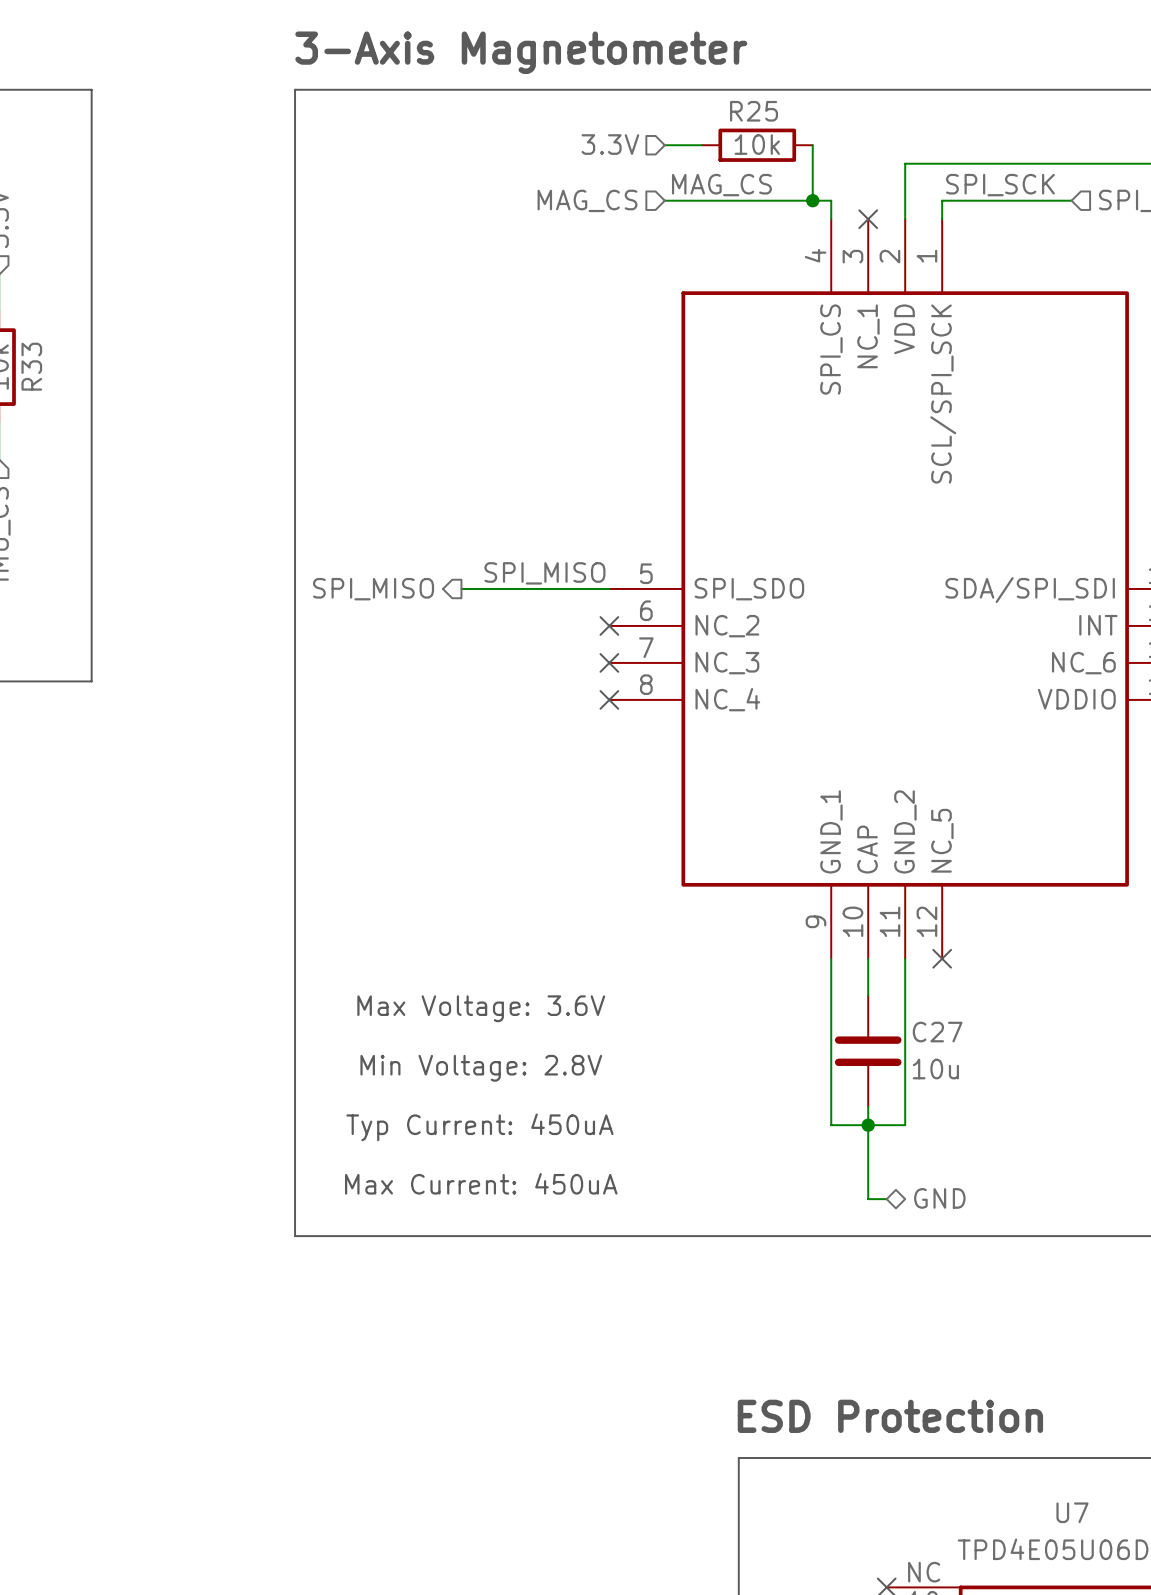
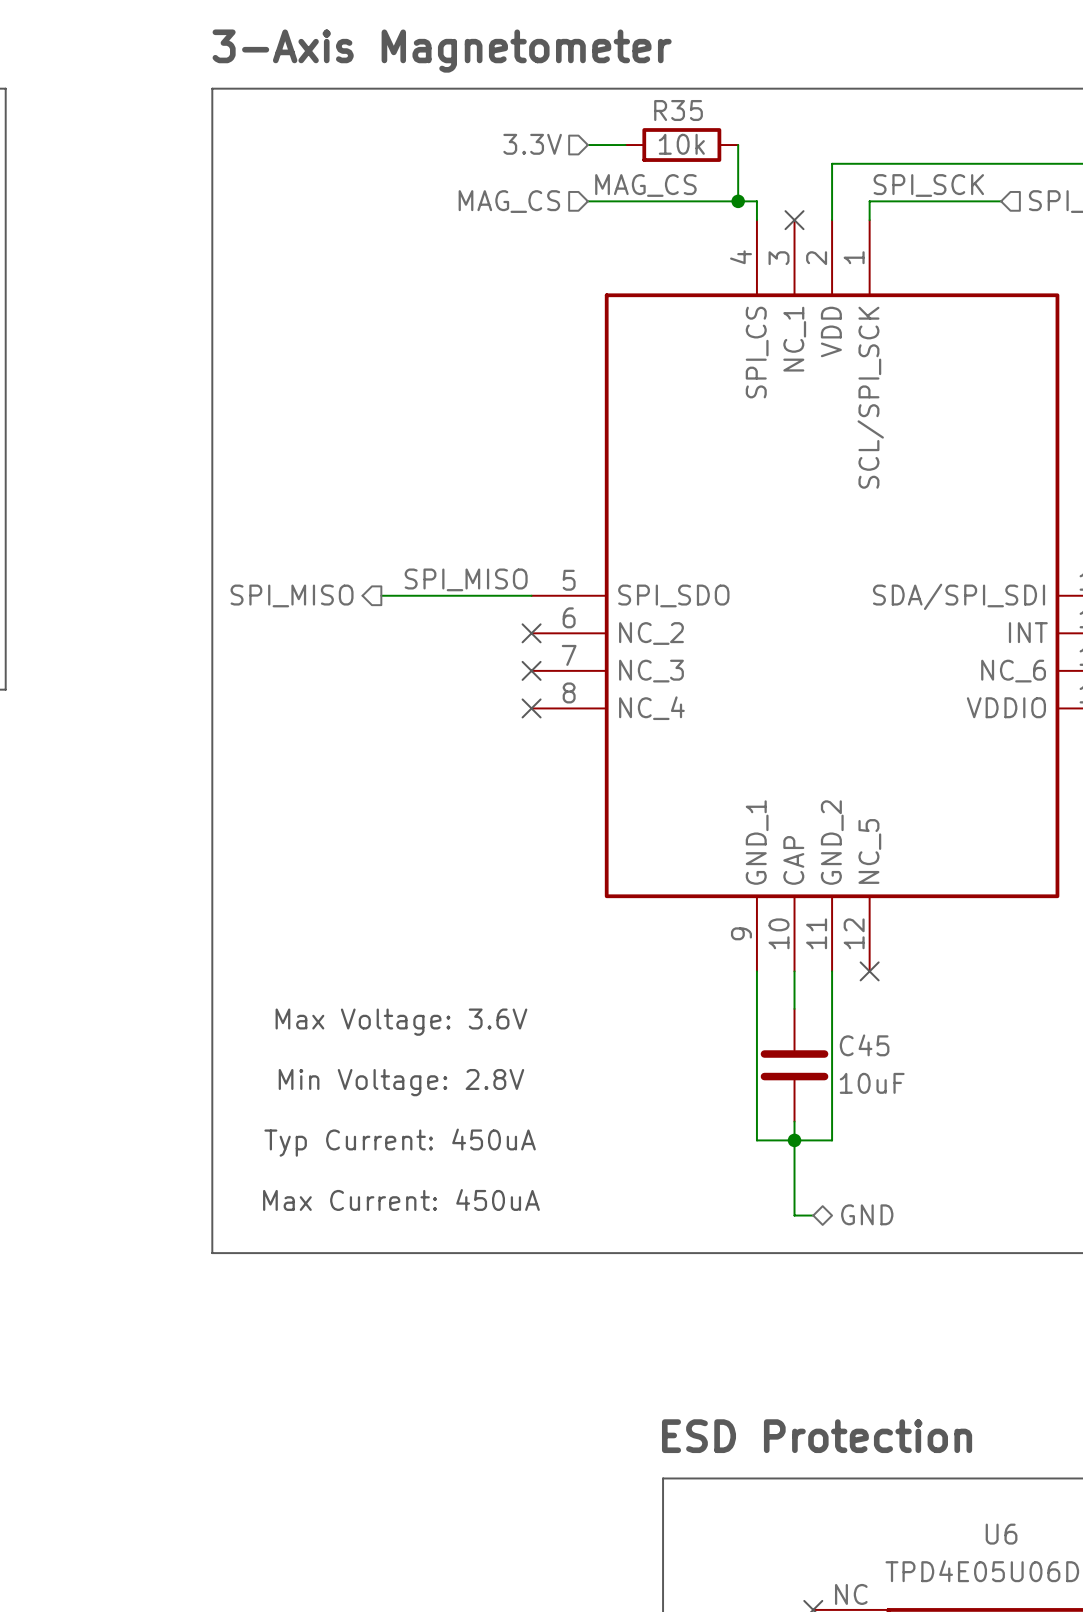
R25 name: R25 (754, 111) -> R35 (678, 110)
C27 name: C27 (937, 1032) -> C45 (864, 1045)
C27 value: 10u (935, 1069) -> 10uF (872, 1083)
U7 name: U7 (1072, 1512) -> U6 (1001, 1534)

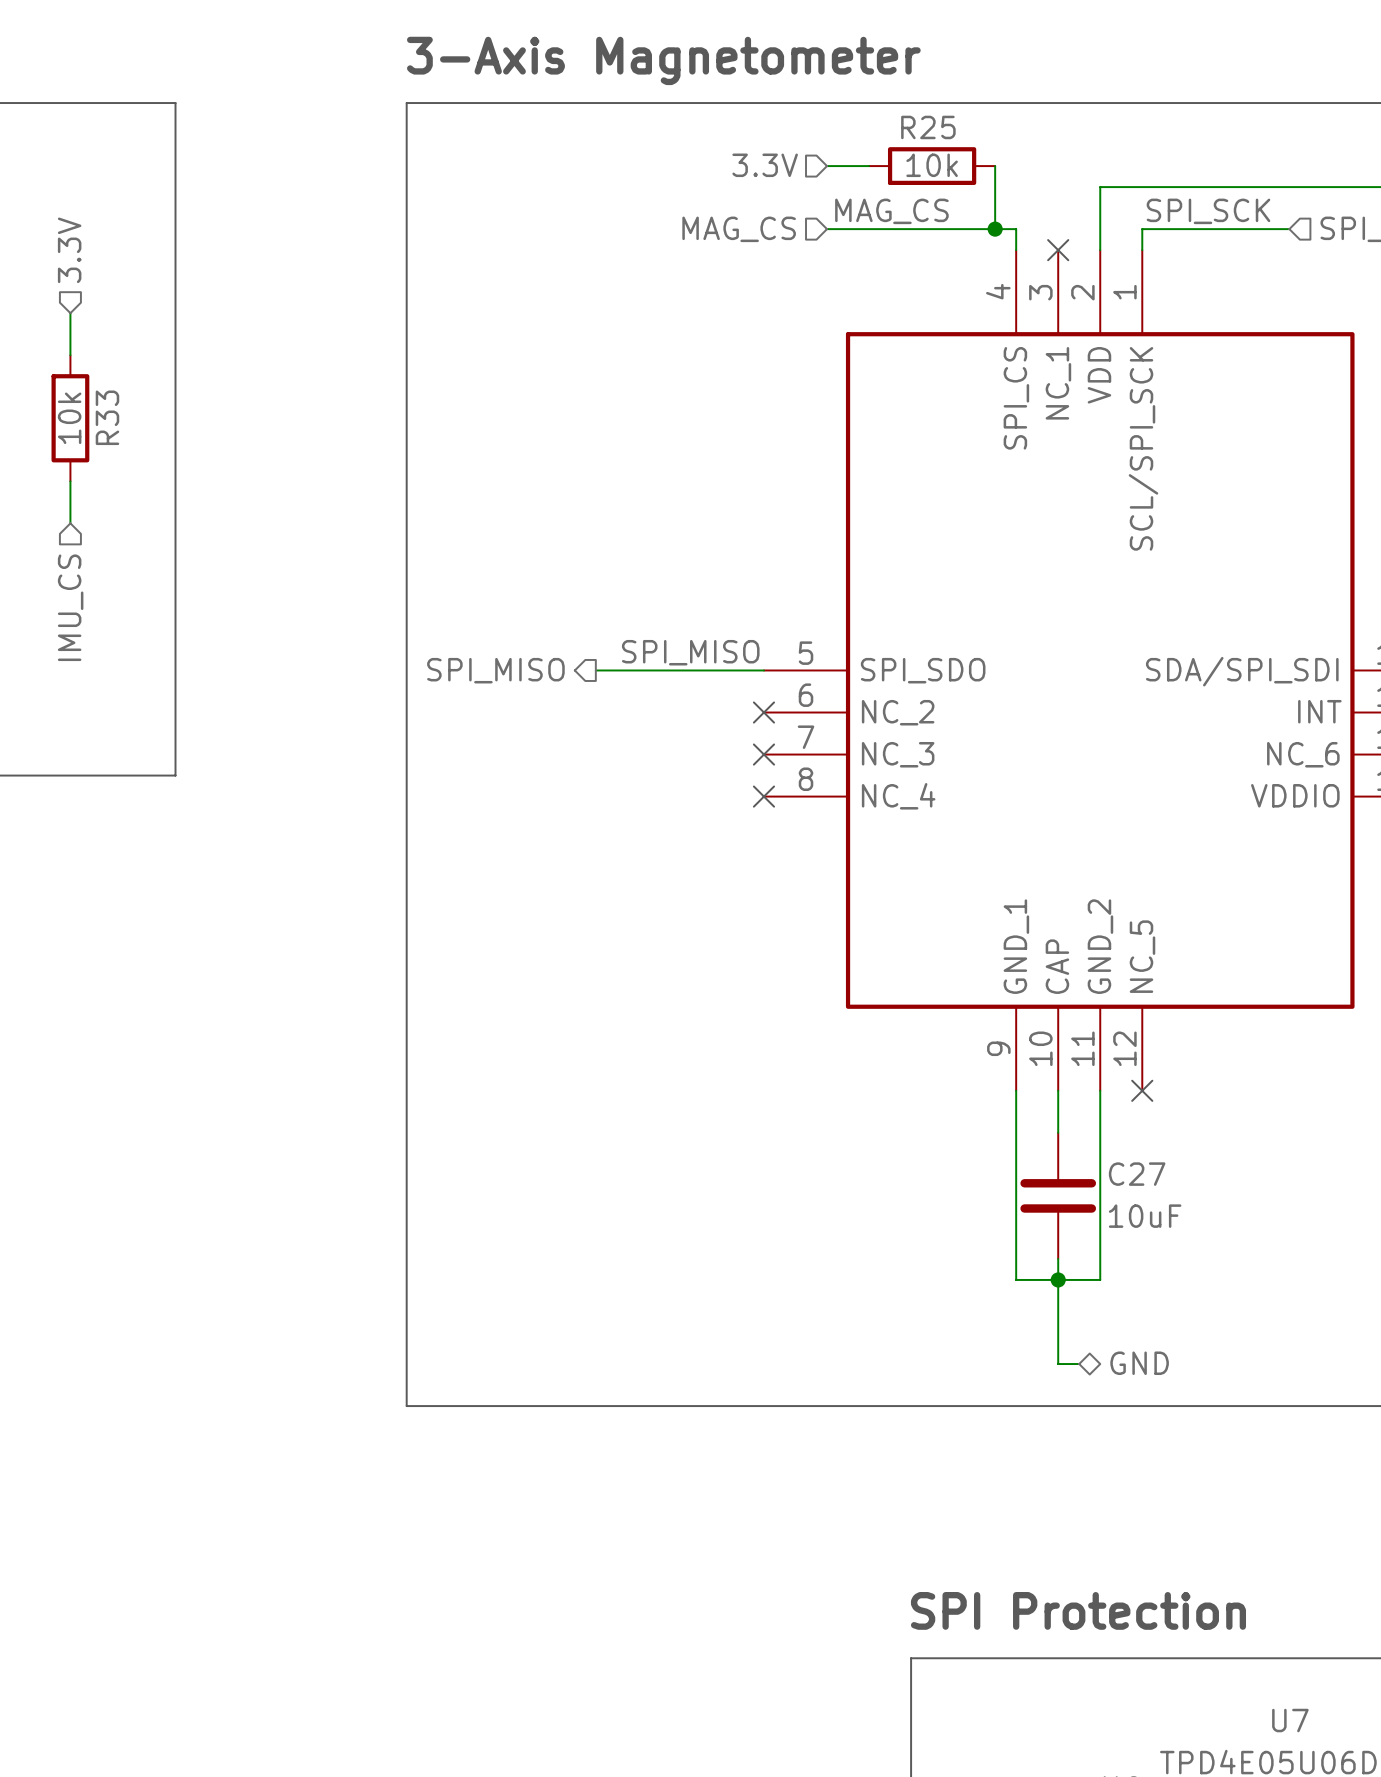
R35 name: R35 (678, 110) -> R25 (928, 127)
text: Max Voltage: 3.6V (401, 1022) -> none
C45 name: C45 (864, 1045) -> C27 (1137, 1174)
text: Min Voltage: 2.8V (401, 1082) -> none
text: Typ Current: 450uA (400, 1142) -> none
text: Max Current: 450uA (401, 1199) -> none
text: ESD Protection (817, 1436) -> SPI Protection (1078, 1610)
U6 name: U6 (1001, 1534) -> U7 (1290, 1720)

